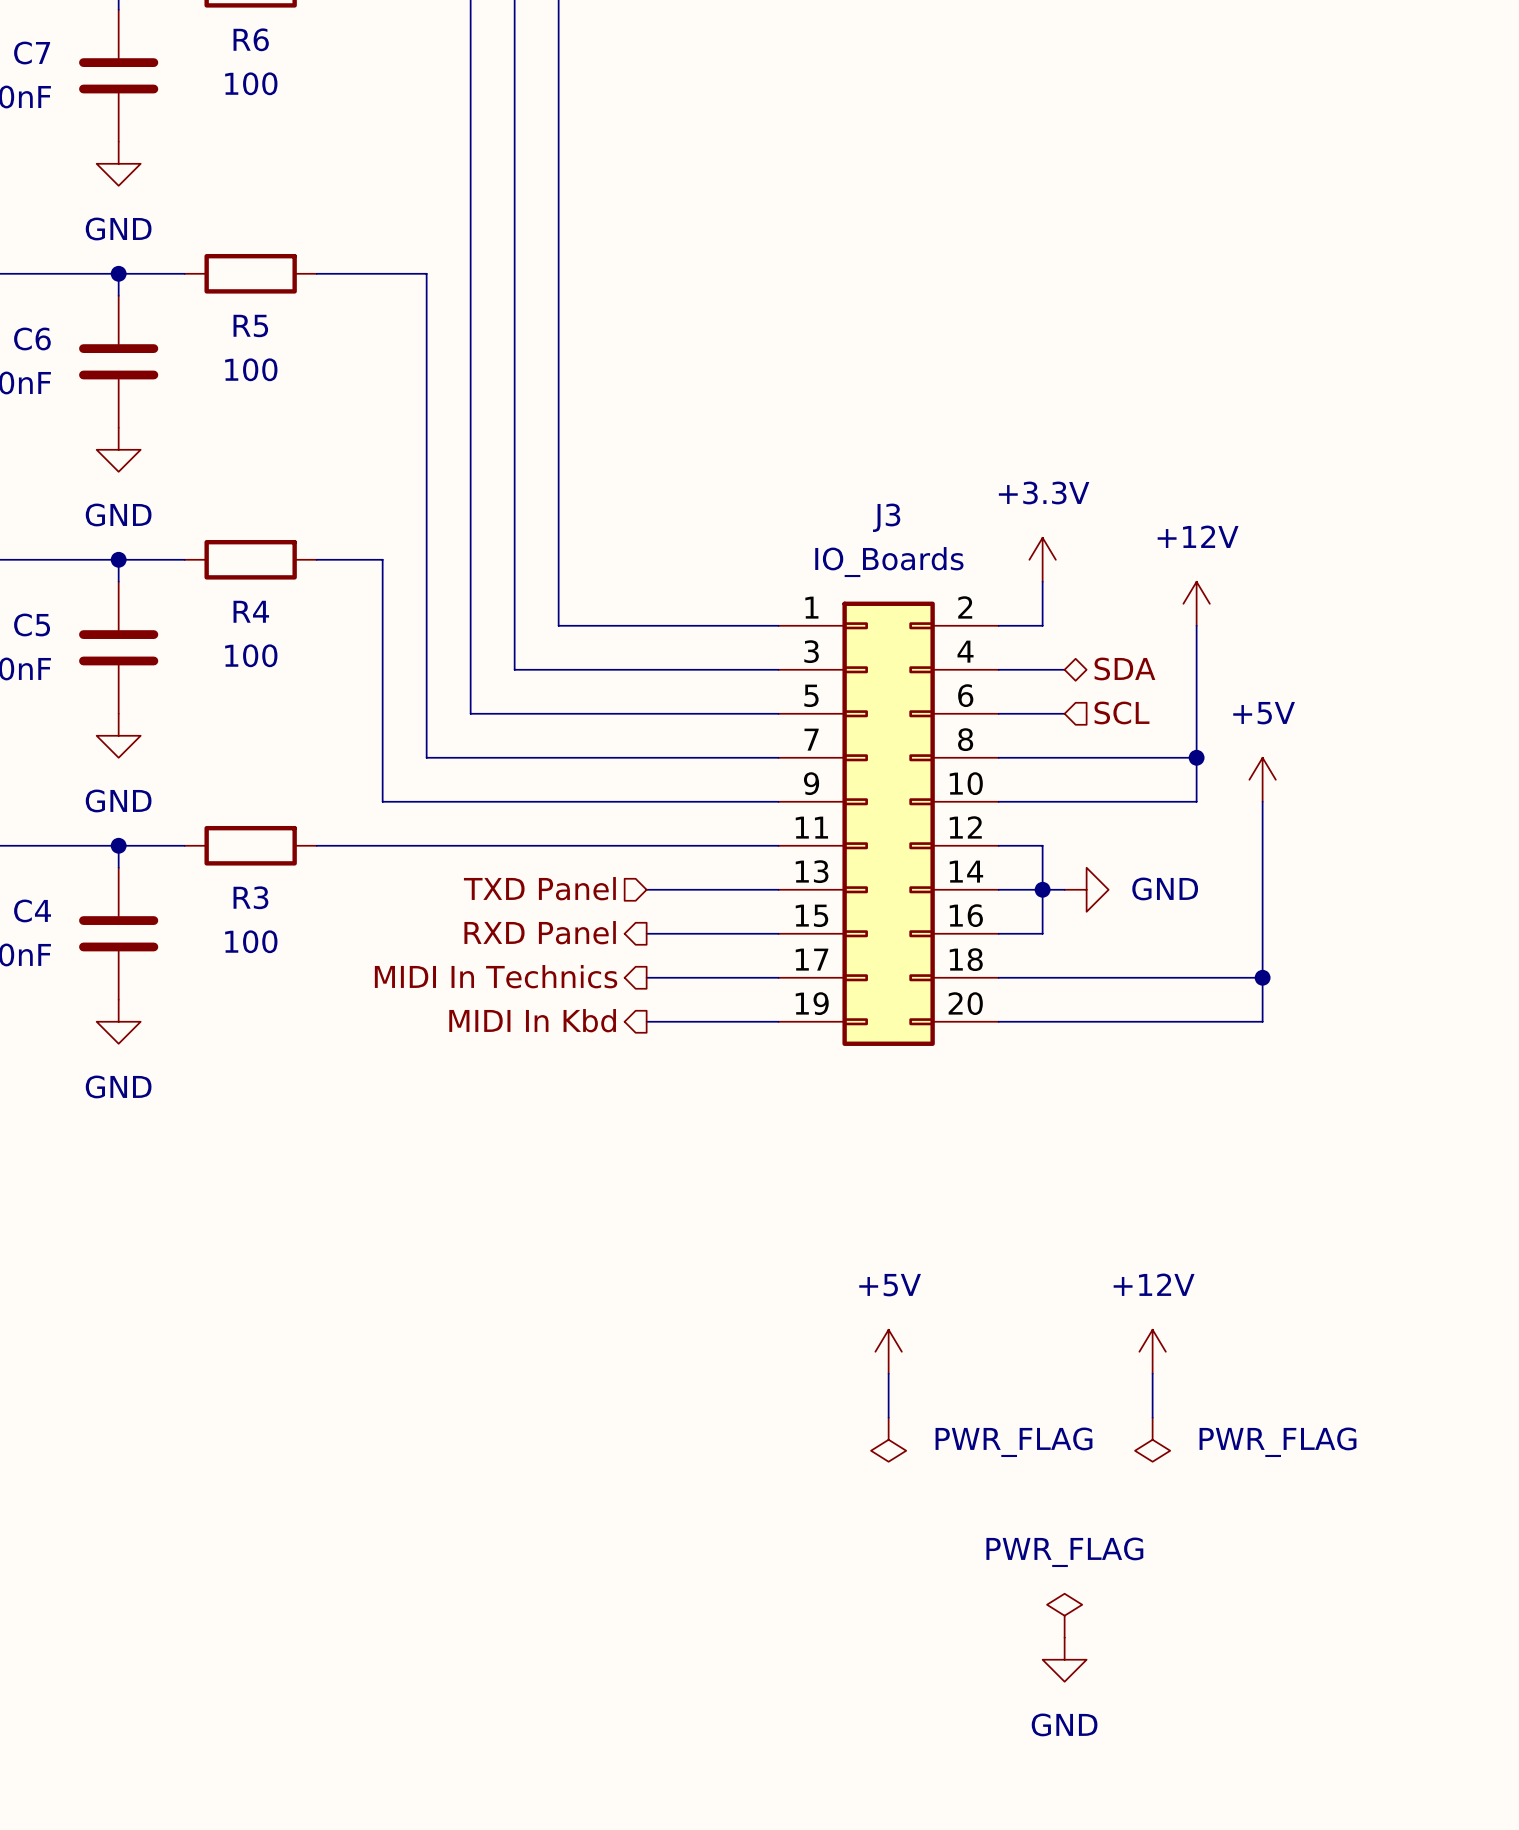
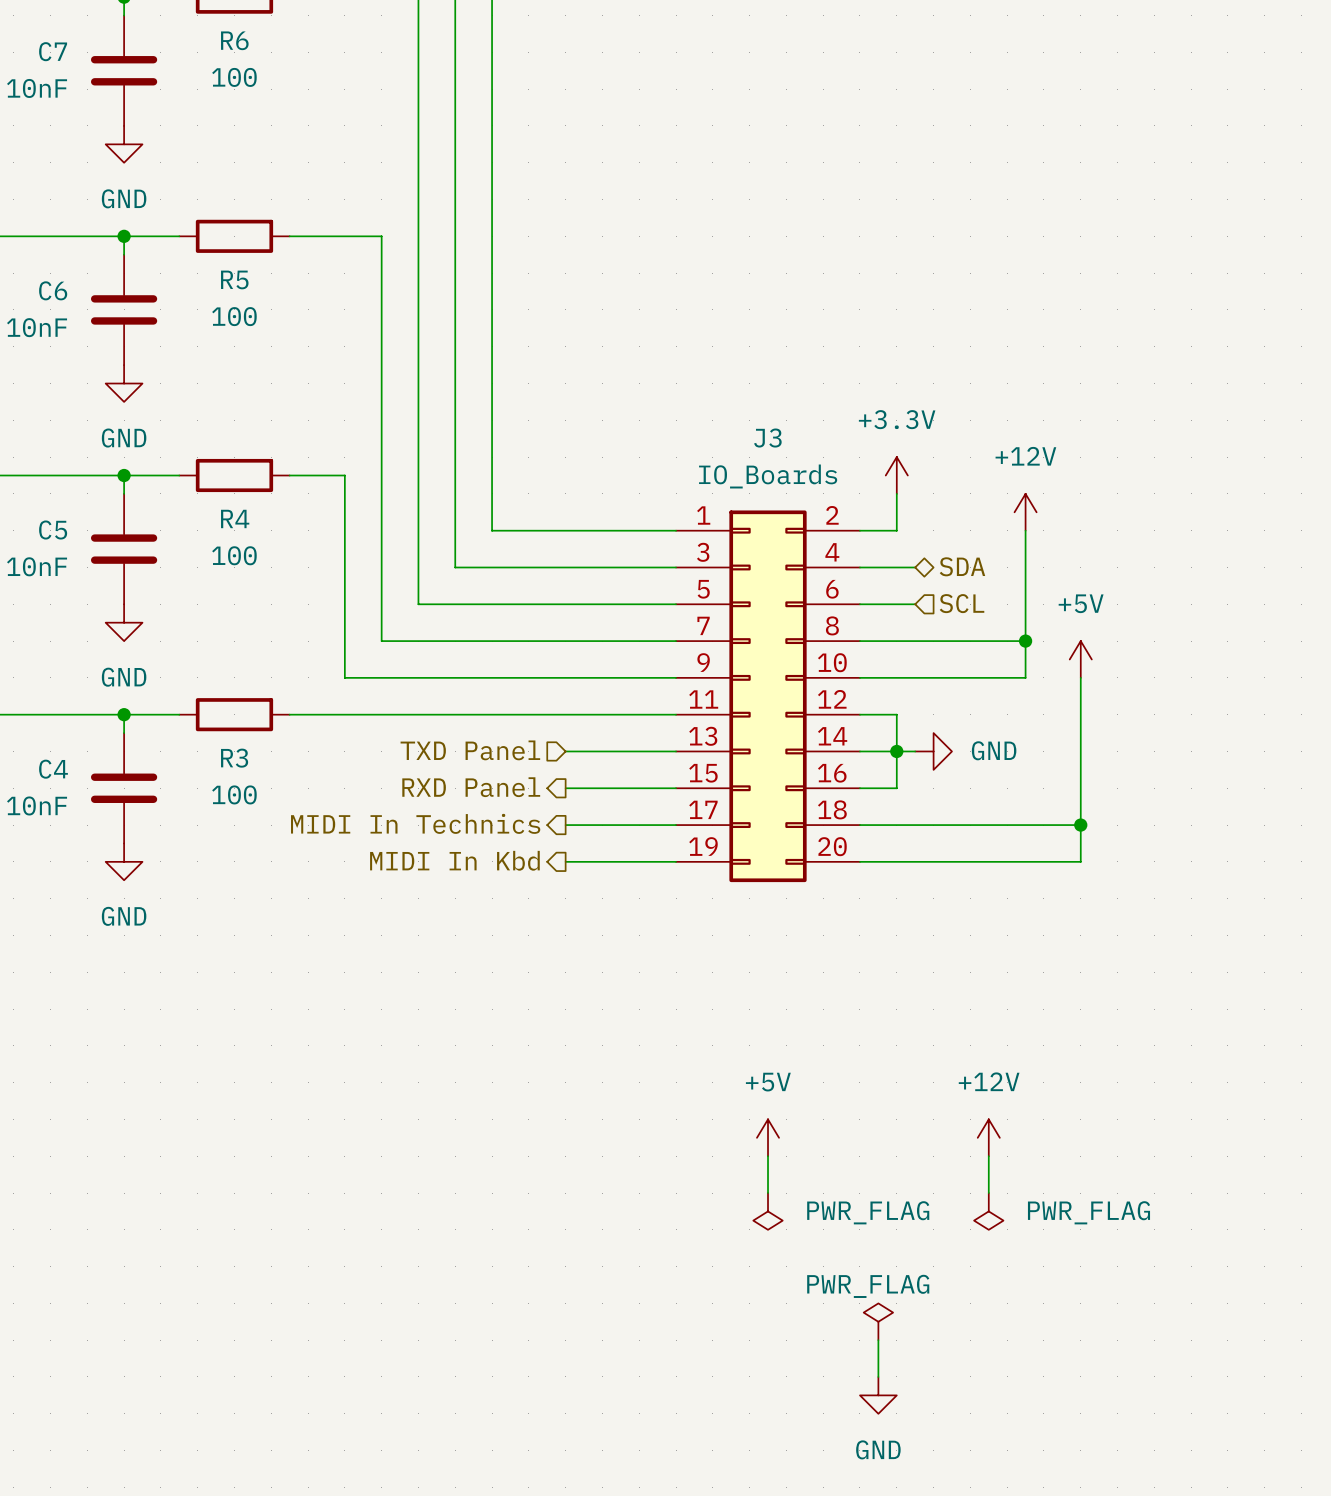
power symbol text position: PWR_FLAG (1064, 1552) -> PWR_FLAG (868, 1286)
wire: none -> (878, 1340) (878, 1376)
power symbol position: PWR_FLAG (1064, 1615) -> PWR_FLAG (878, 1321)
power symbol position: GND (1064, 1659) -> GND (878, 1395)

